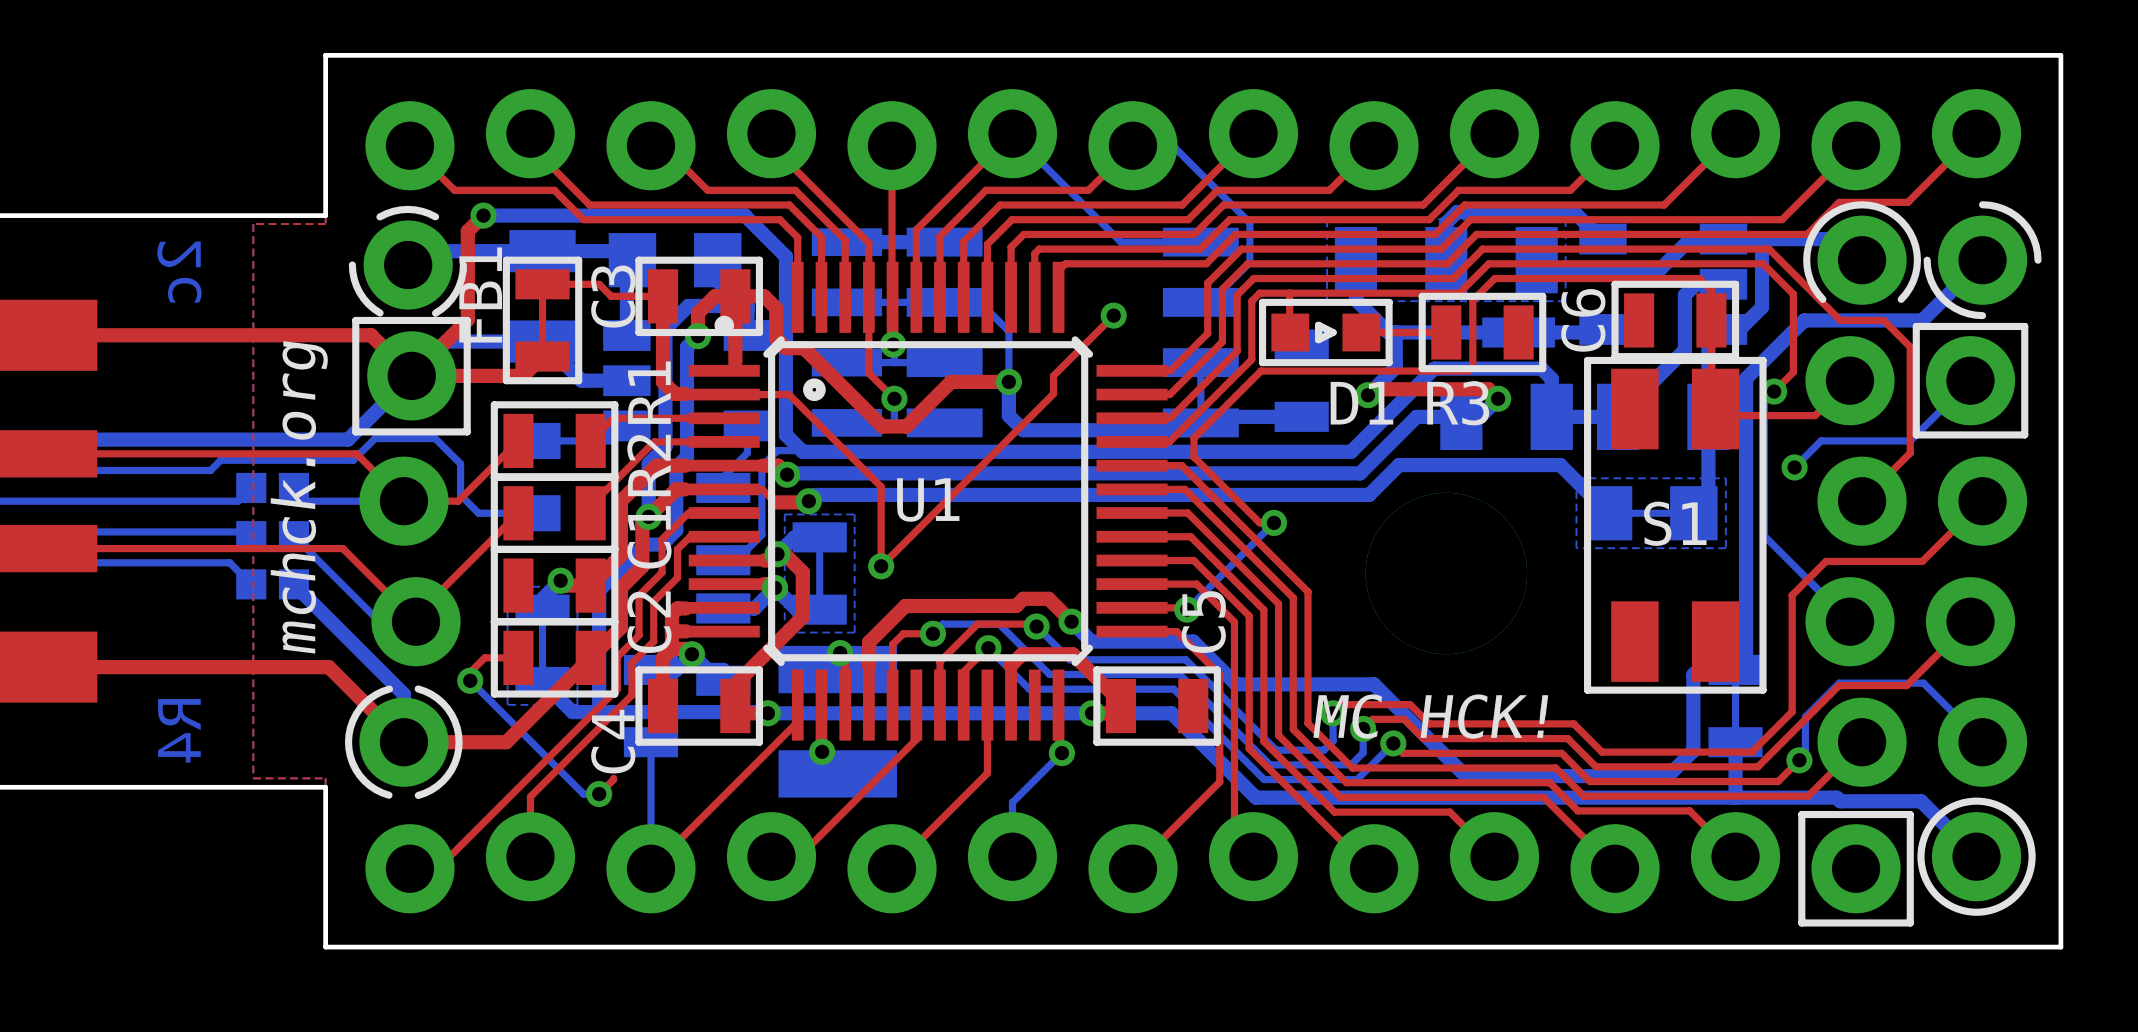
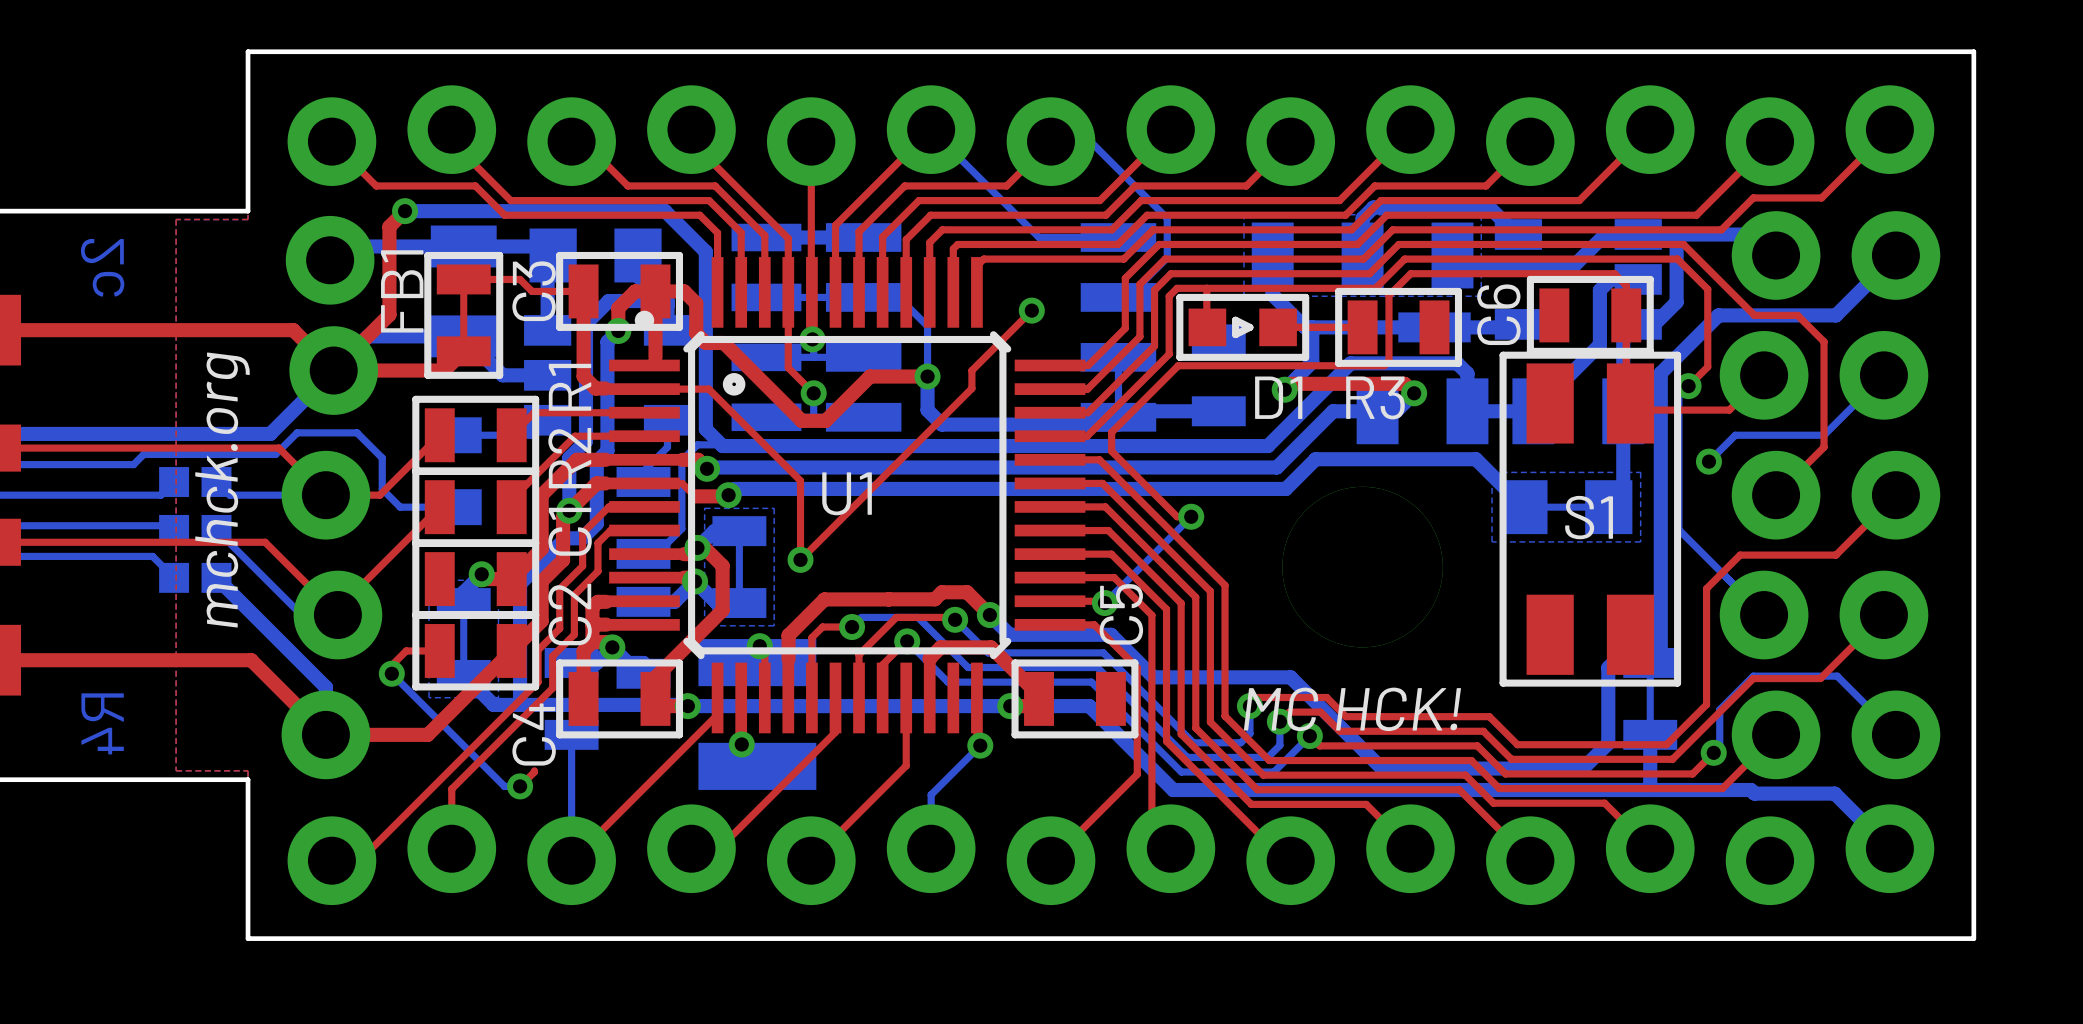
line: (1982, 204) (2003, 208) (2021, 221) (2033, 238) (2038, 260) -> none
line: (379, 216) (393, 211) (407, 209) (422, 211) (435, 216) -> none
line: (1927, 260) (1931, 281) (1943, 299) (1961, 311) (1982, 315) -> none
line: (352, 265) (354, 279) (359, 292) (368, 304) (380, 313) -> none
line: (463, 265) (461, 279) (455, 292) (447, 304) (435, 313) -> none
line: (1822, 299) (1810, 281) (1807, 267) (1807, 252) (1810, 239) (1818, 226) (1834, 212) (1847, 206) (1862, 204) (1876, 206) (1889, 212) (1906, 226) (1913, 239) (1916, 252) (1916, 267) (1910, 287) (1901, 299) -> none
line: (355, 320) (355, 431) (467, 431) (467, 320) (355, 320) -> none
line: (1916, 326) (1916, 434) (2024, 434) (2024, 326) (1916, 326) -> none
line: (418, 688) (437, 698) (447, 708) (454, 721) (459, 742) (457, 756) (447, 775) (431, 789) (418, 795) -> none
line: (389, 689) (370, 698) (360, 708) (350, 727) (348, 741) (350, 756) (359, 775) (375, 789) (389, 795) -> none
drawing: [1917, 797, 2036, 916] -> none
line: (1801, 814) (1910, 814) (1910, 922) (1801, 922) (1801, 814) -> none

